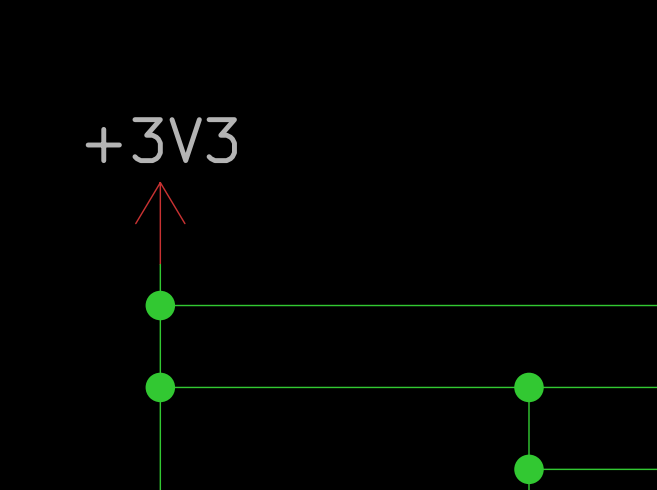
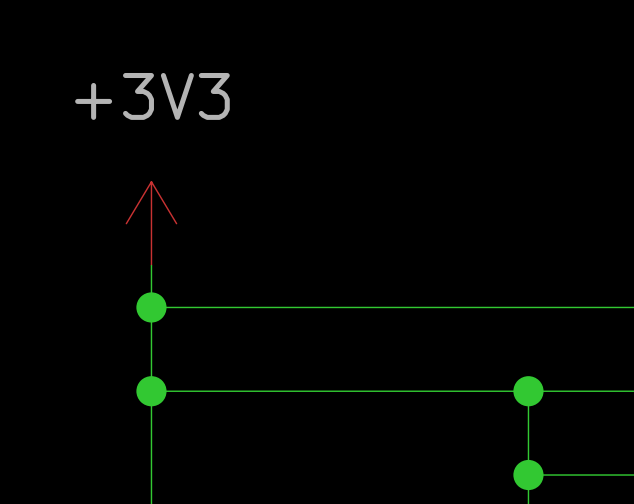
power symbol text position: +3V3 (161, 140) -> +3V3 (152, 96)

